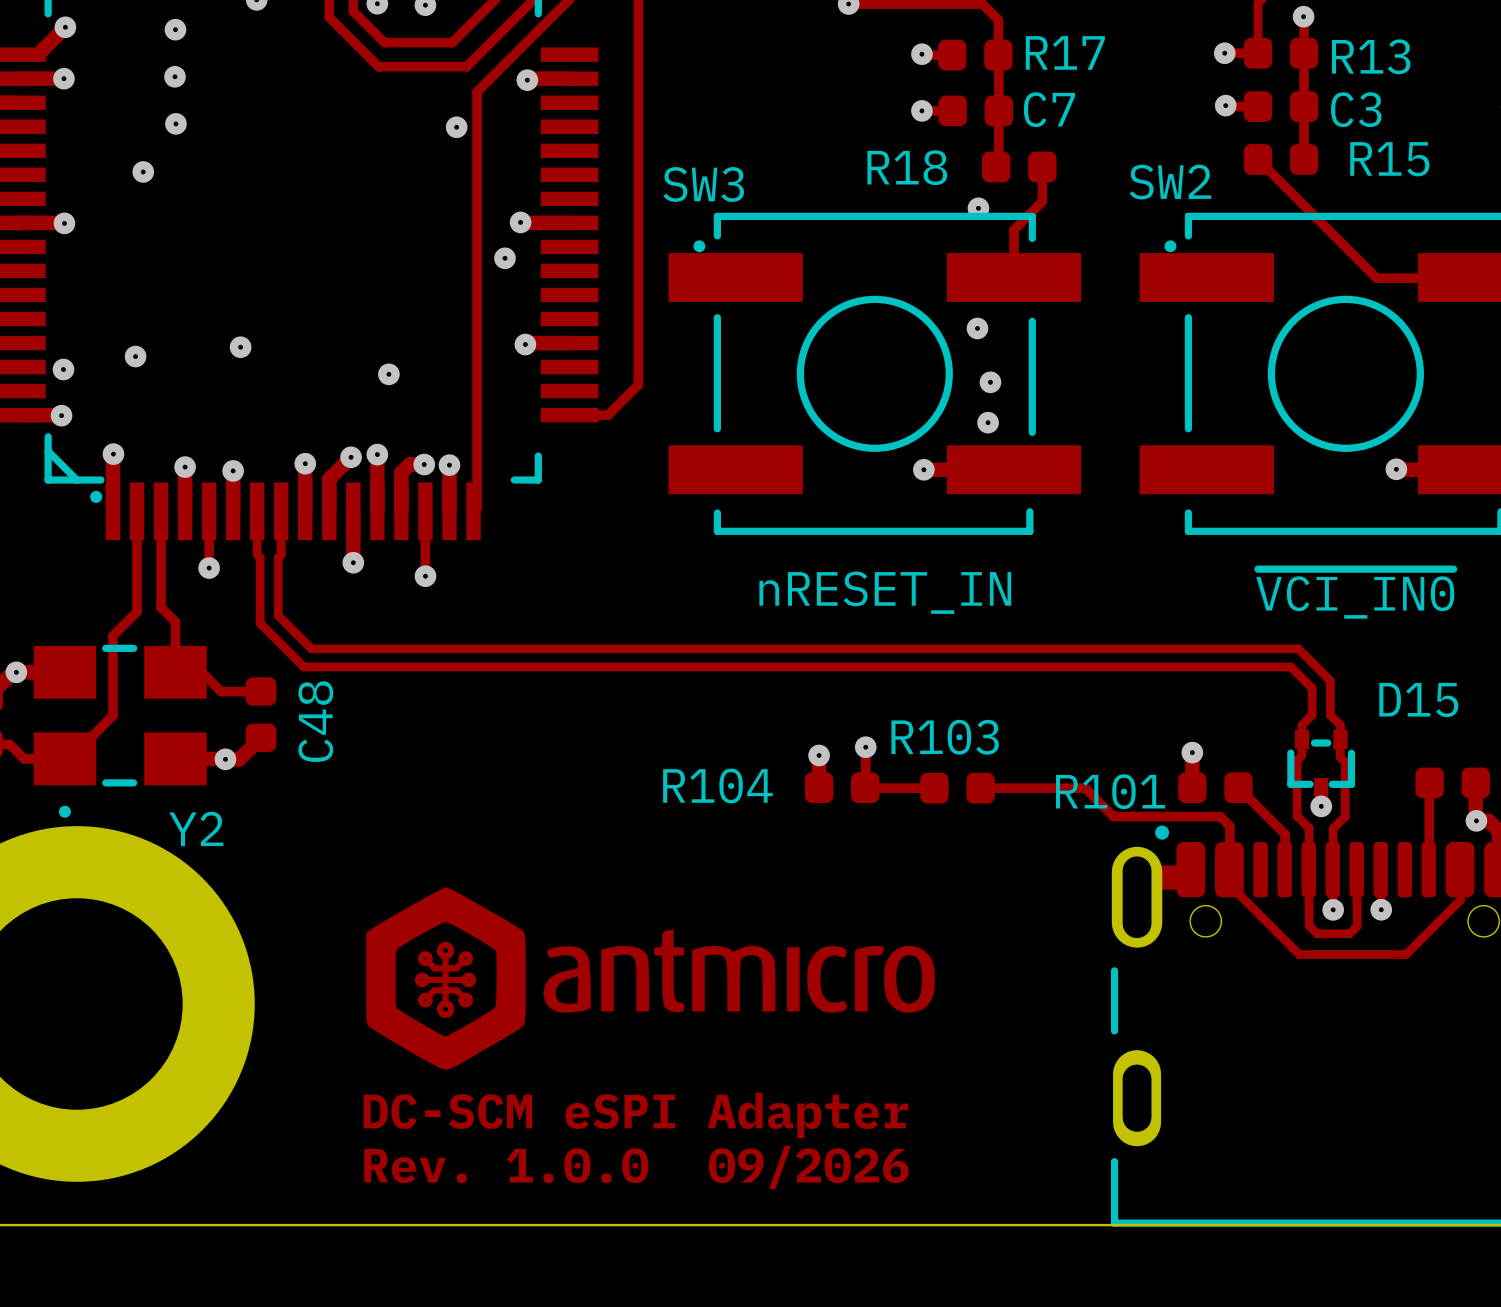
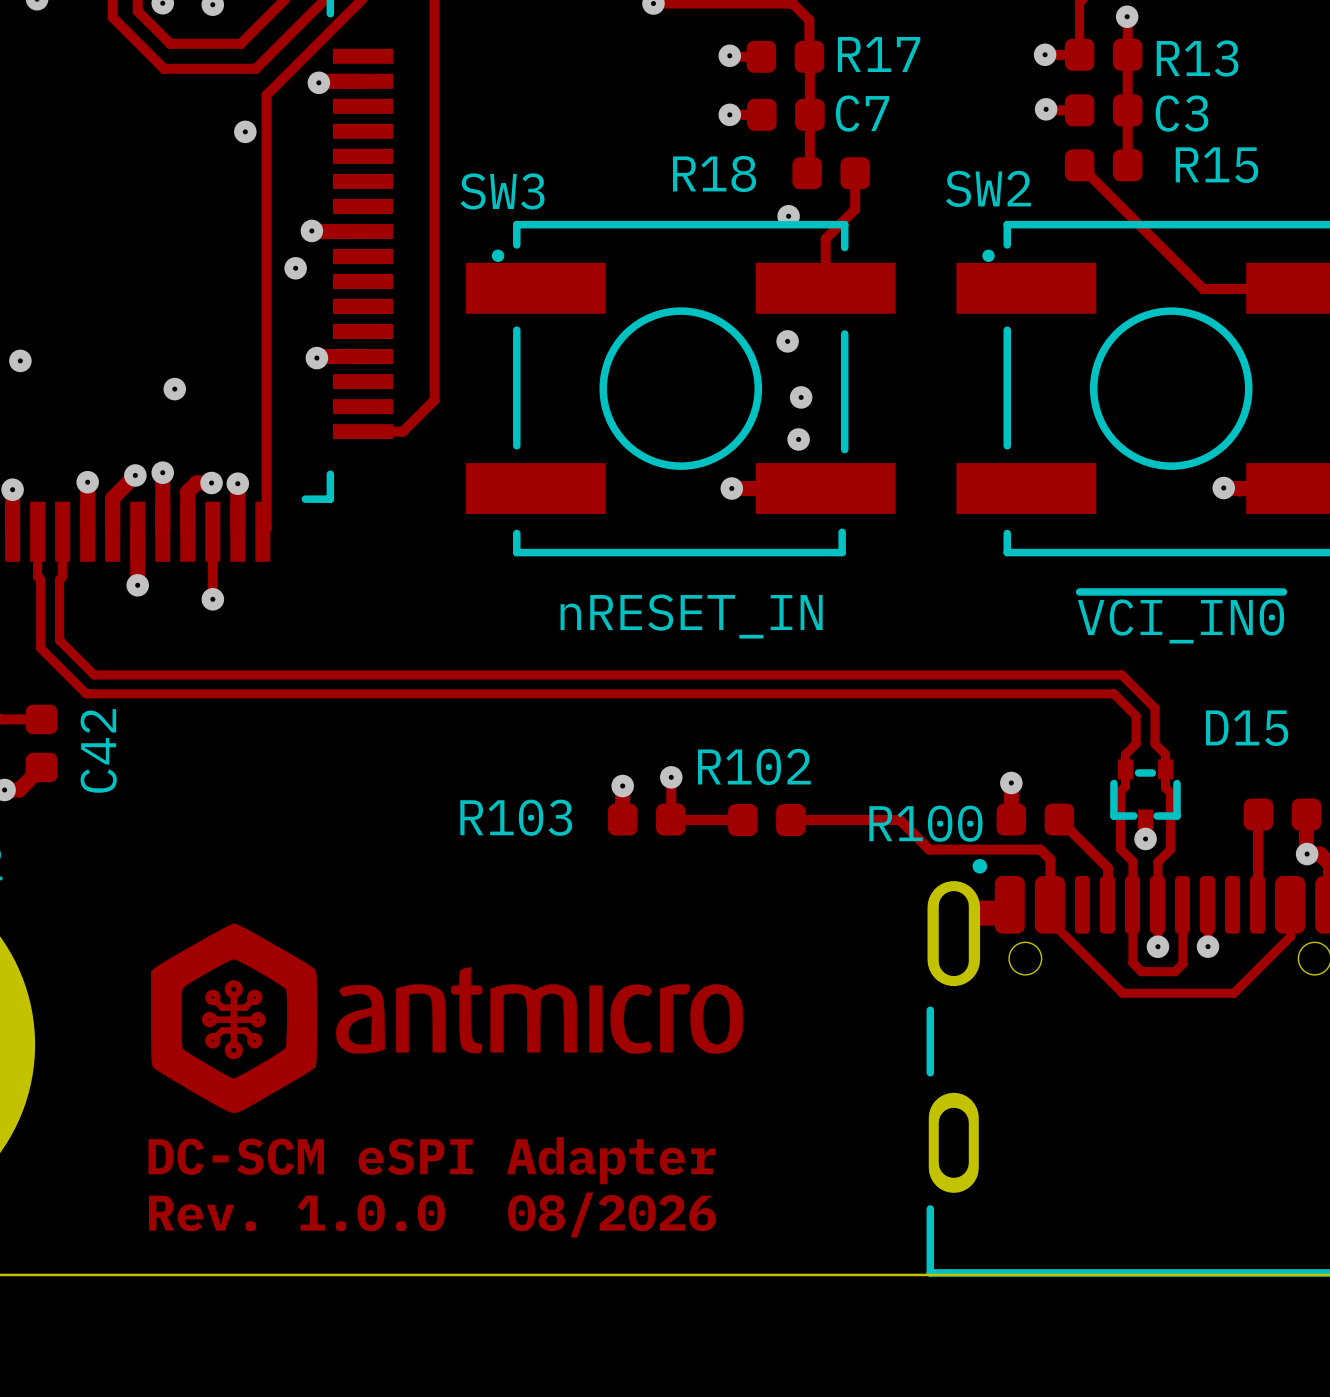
C48 name: C48 (315, 721) -> C42 (98, 750)
R103 name: R103 (945, 737) -> R102 (754, 767)
R104 name: R104 (717, 785) -> R103 (516, 817)
R101 name: R101 (1110, 791) -> R100 (925, 823)
text: Rev. 1.0.0 09/2026 (636, 1167) -> Rev. 1.0.0 08/2026 (432, 1215)

